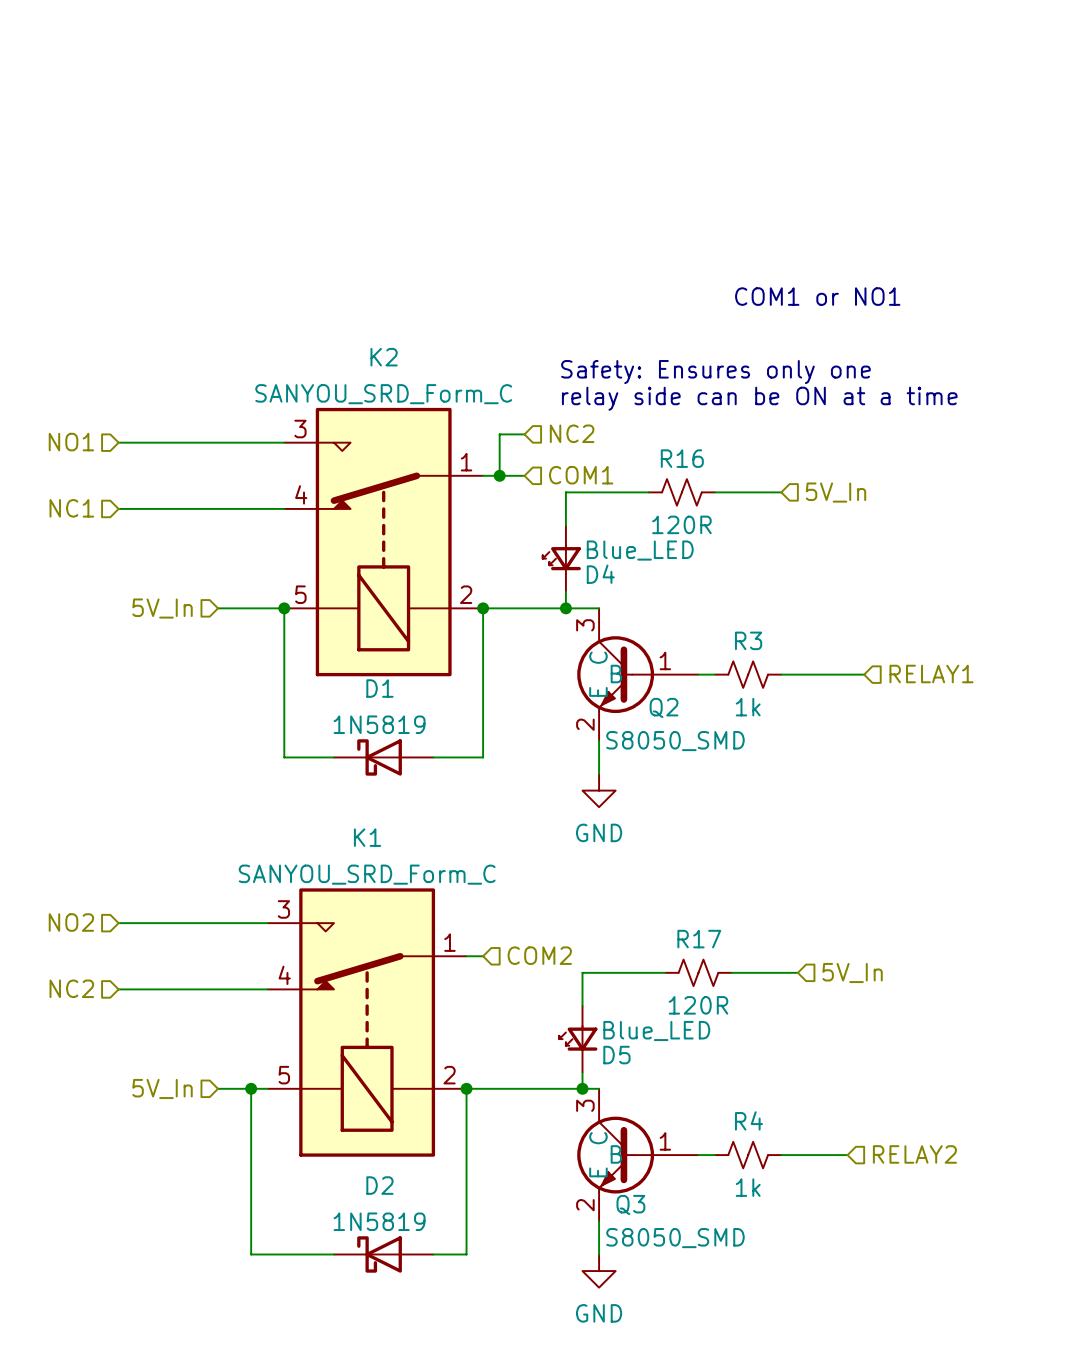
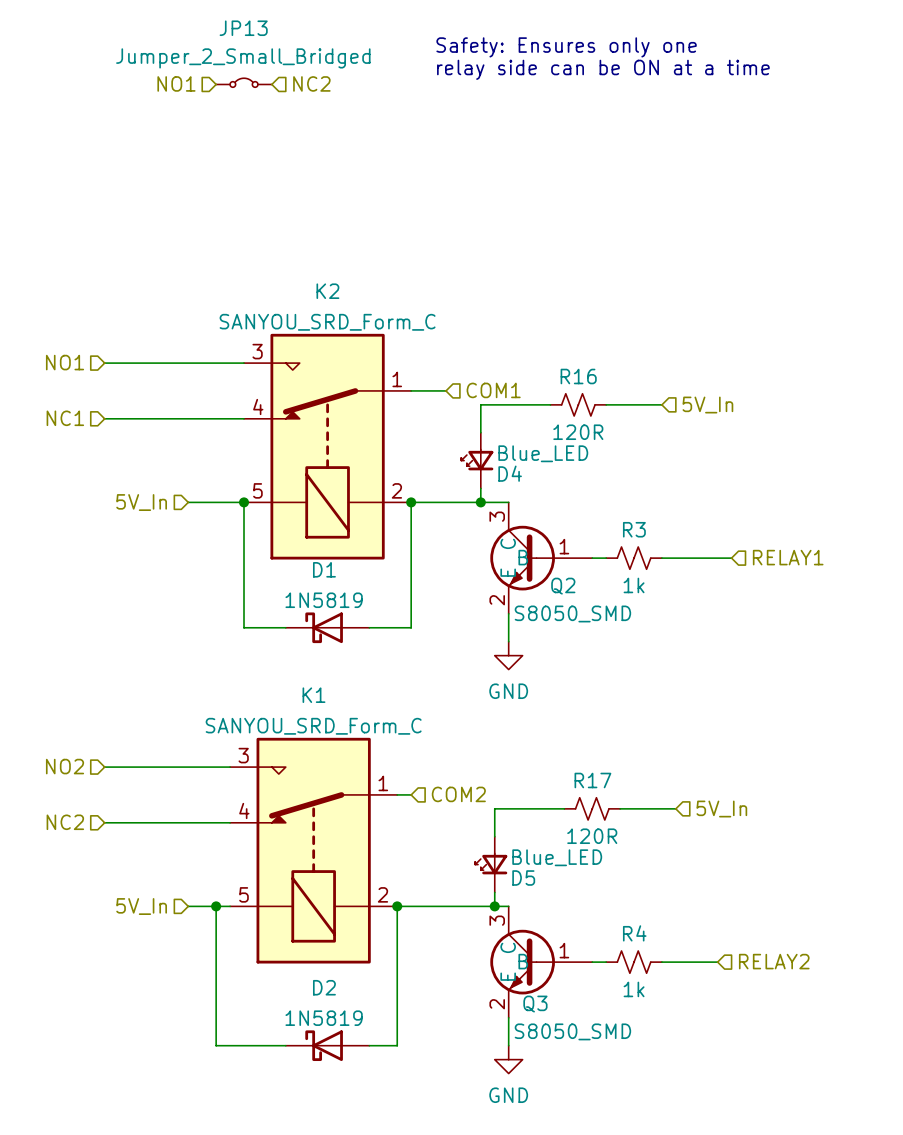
JP13: none -> Jumper_2_Small_Bridged (244, 82)
hierarchical label: none -> NO1 (176, 83)
hierarchical label: none -> NC2 (311, 83)
text: COM1 or NO1 (817, 296) -> none
text position: Safety: Ensures only one (715, 372) -> Safety: Ensures only one (566, 47)
text position: relay side can be ON at a time (759, 398) -> relay side can be ON at a time (603, 69)
hierarchical label: NC2 (572, 433) -> none
wire: (524, 434) (499, 434) (499, 475) -> none
junction: (499, 475) -> none

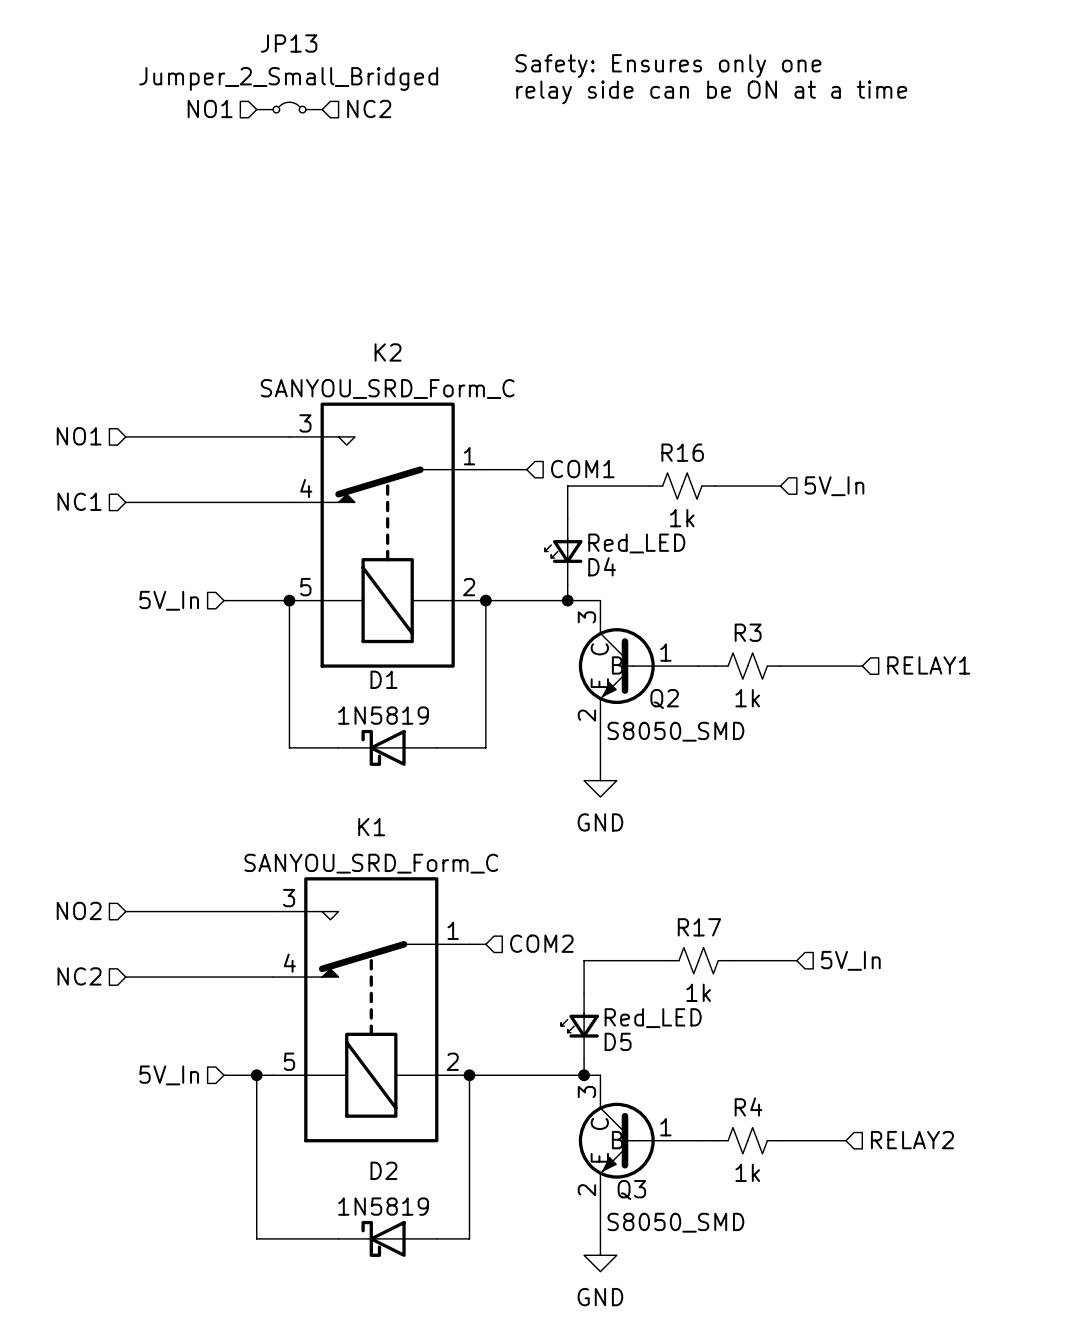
R16 value: 120R (578, 432) -> 1k (682, 518)
D4 value: Blue_LED (543, 453) -> Red_LED (636, 543)
R17 value: 120R (592, 836) -> 1k (698, 992)
D5 value: Blue_LED (557, 857) -> Red_LED (653, 1018)

